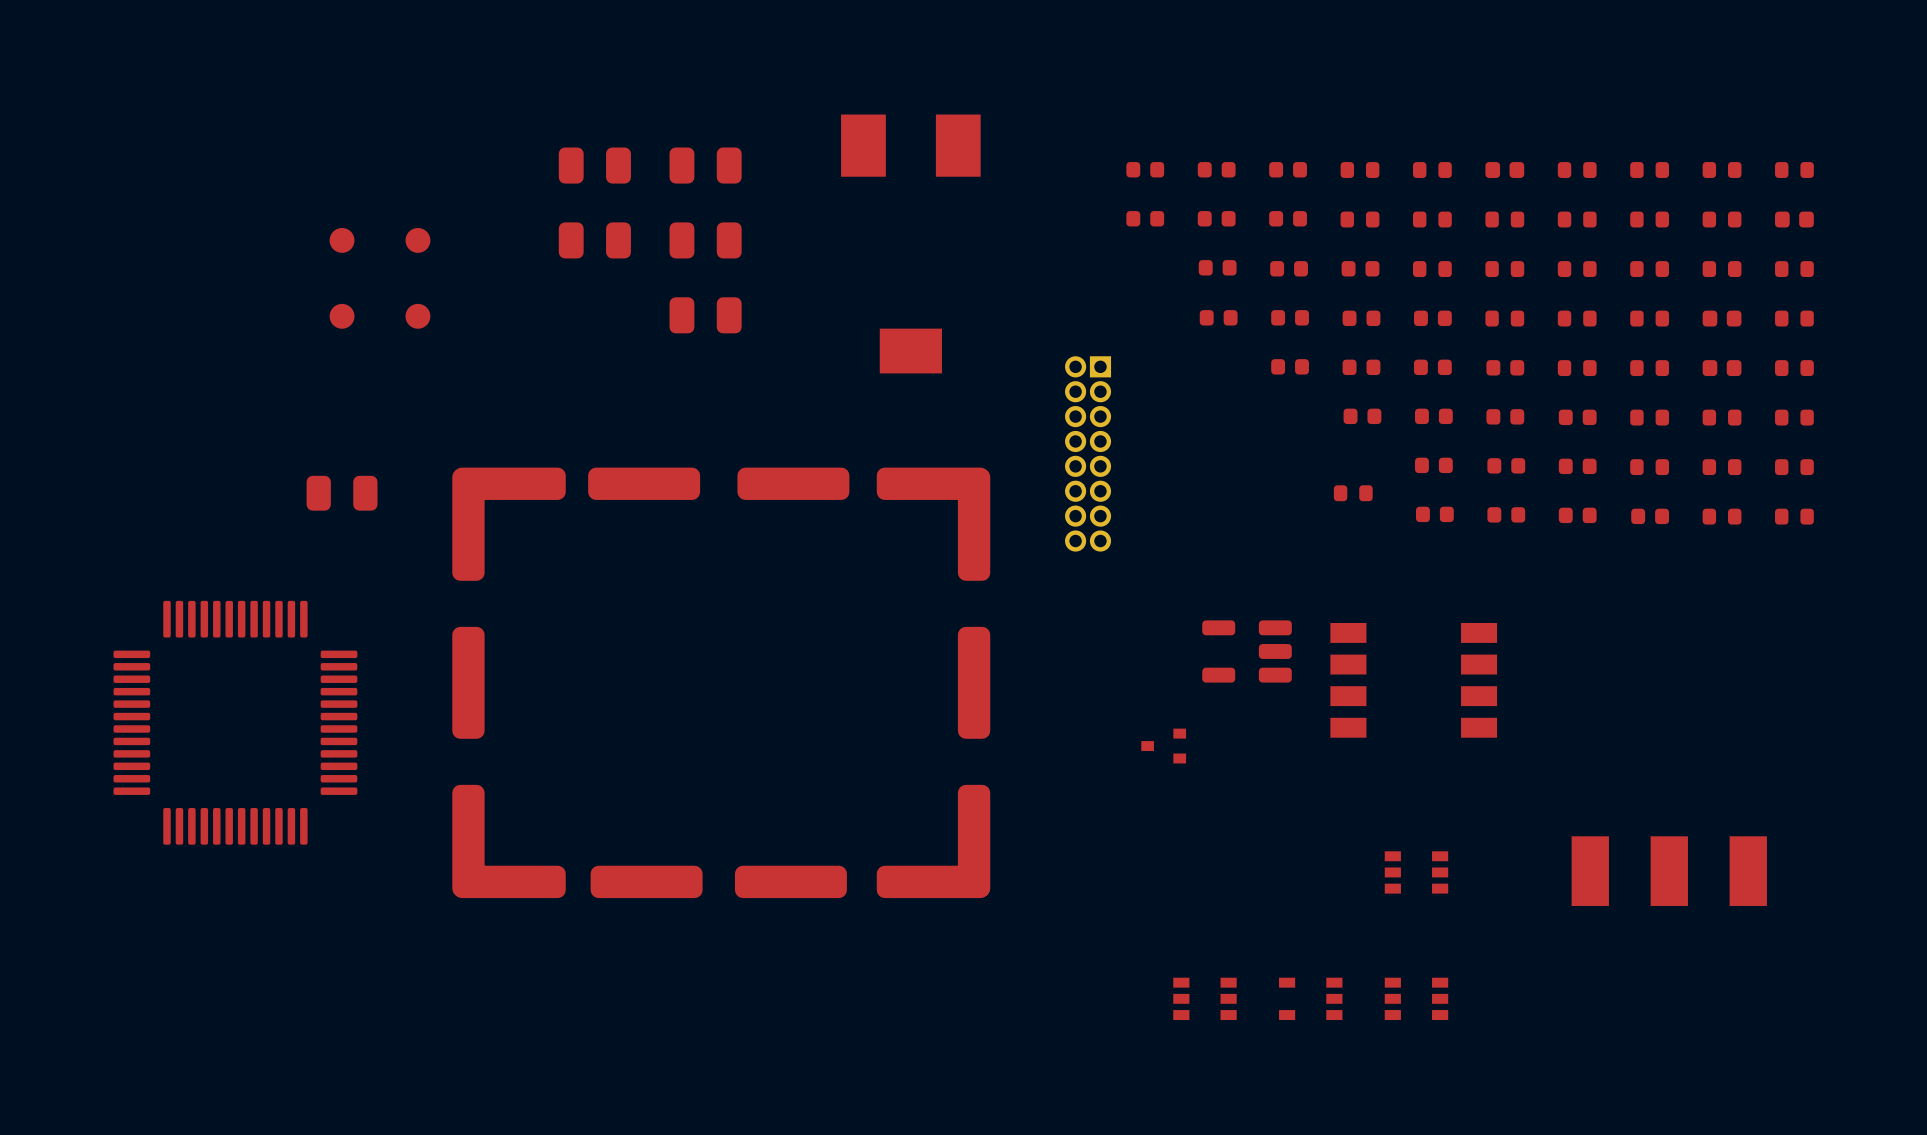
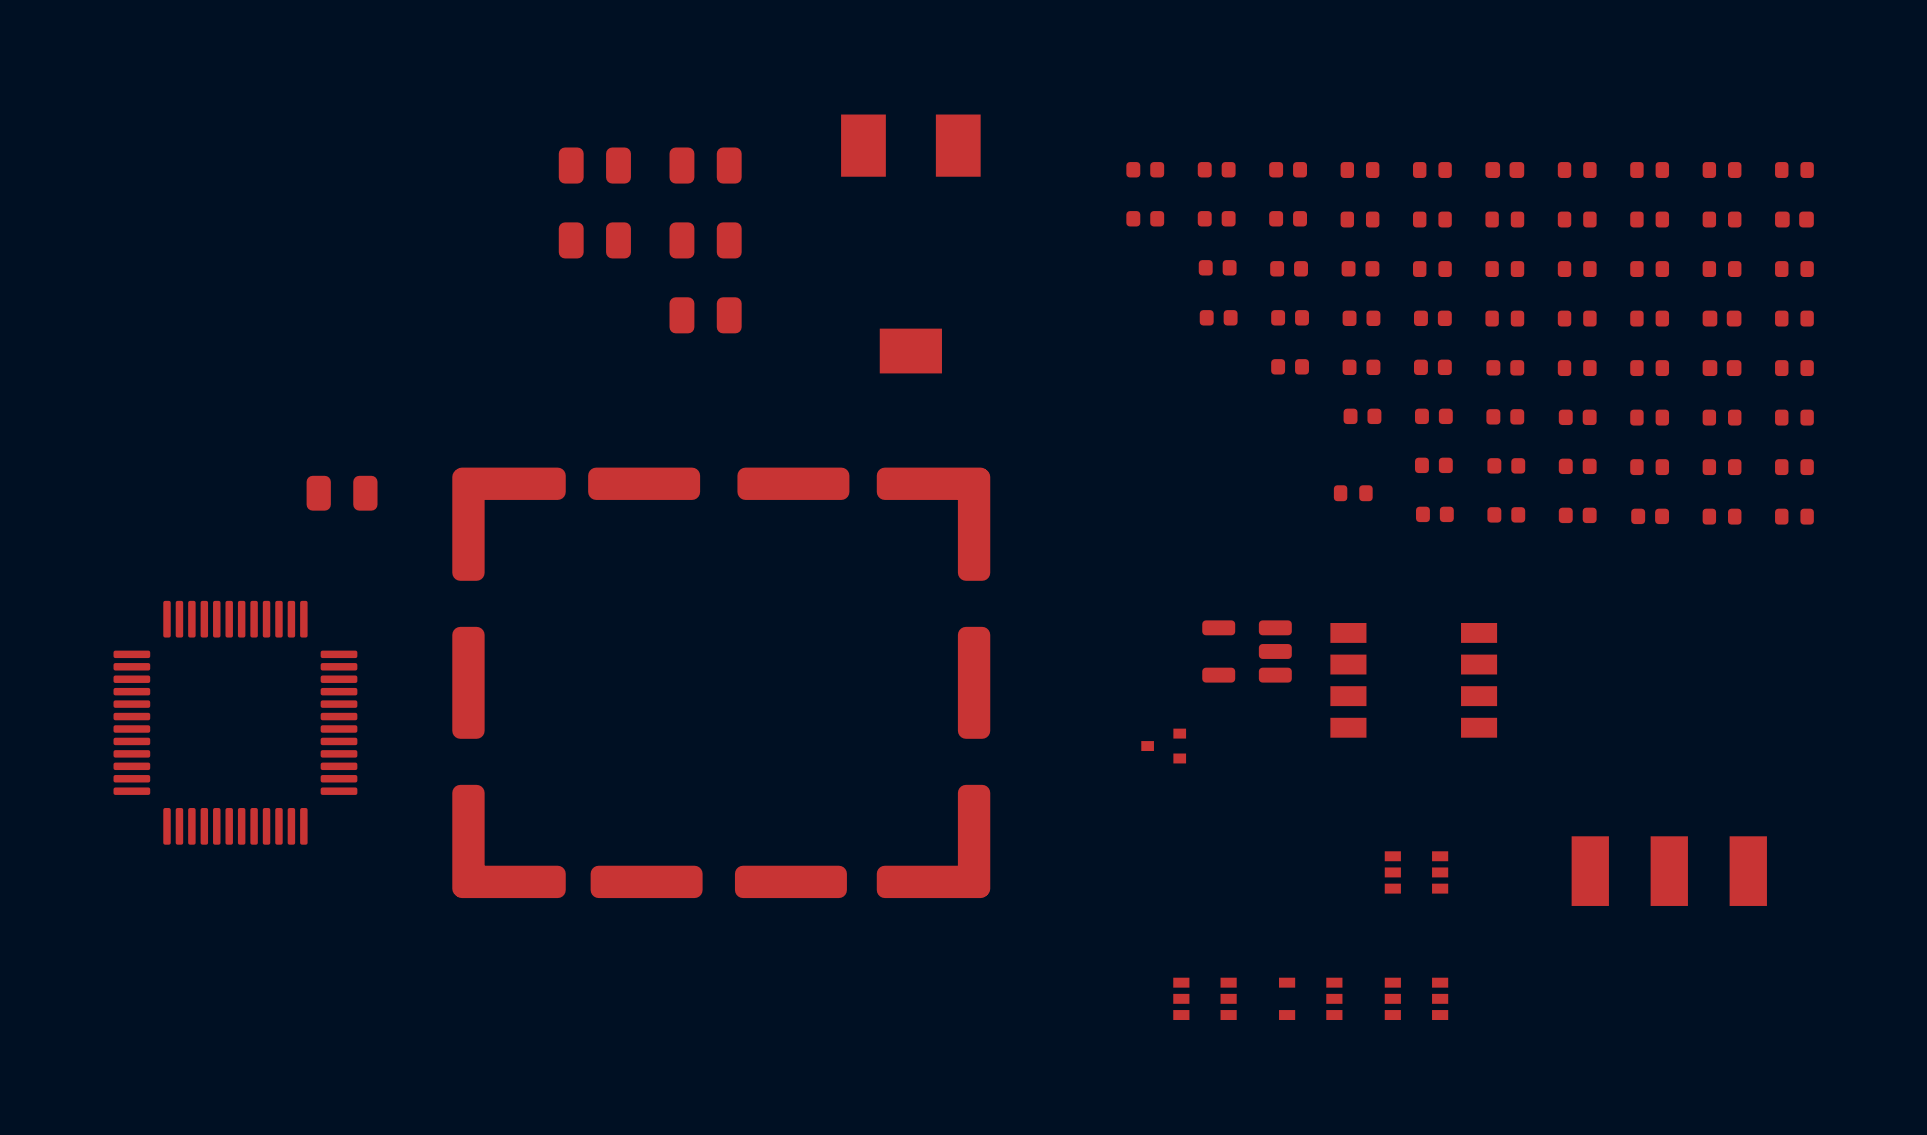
part: (342, 240) -> none
part: (417, 240) -> none
part: (342, 316) -> none
part: (417, 316) -> none
part: (1088, 453) -> none

